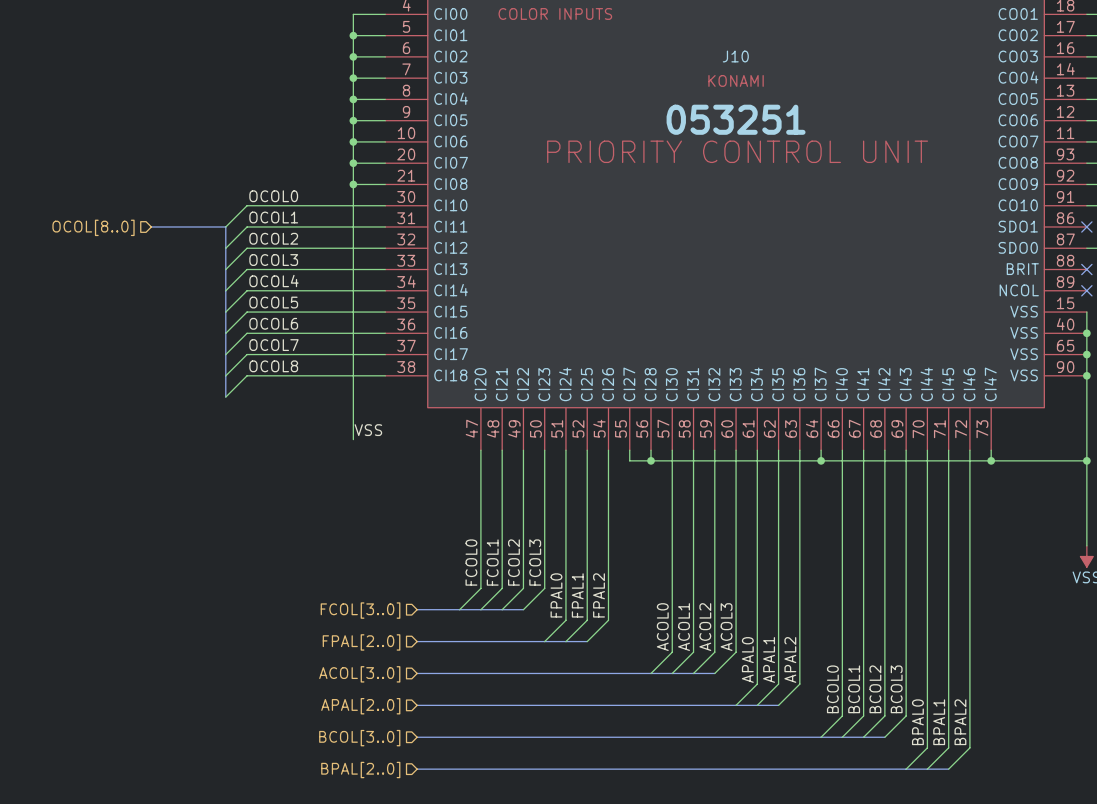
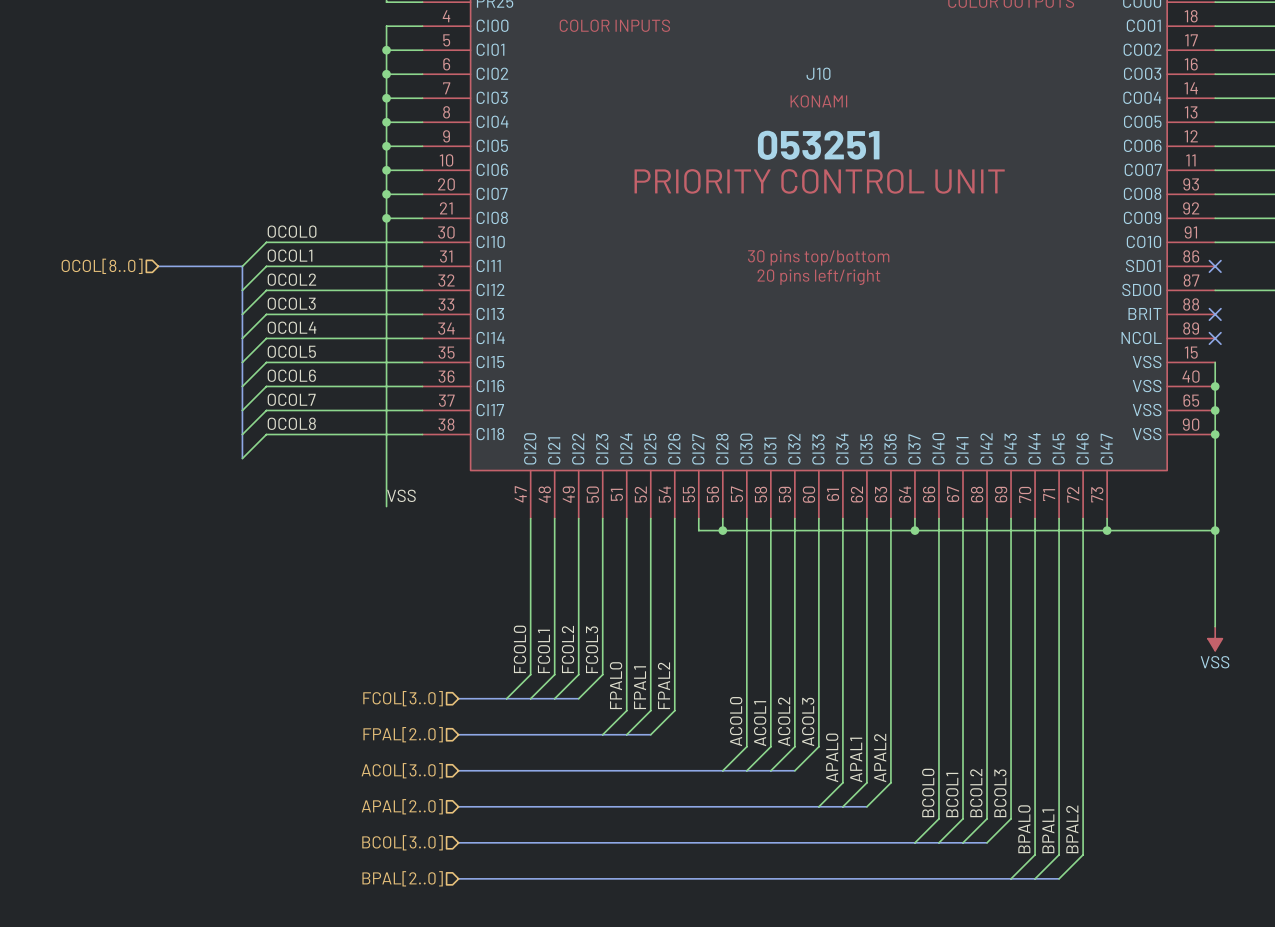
J10 text: none -> 30 pins top/bottom (818, 257)
J10 text: none -> 20 pins left/right (818, 277)

